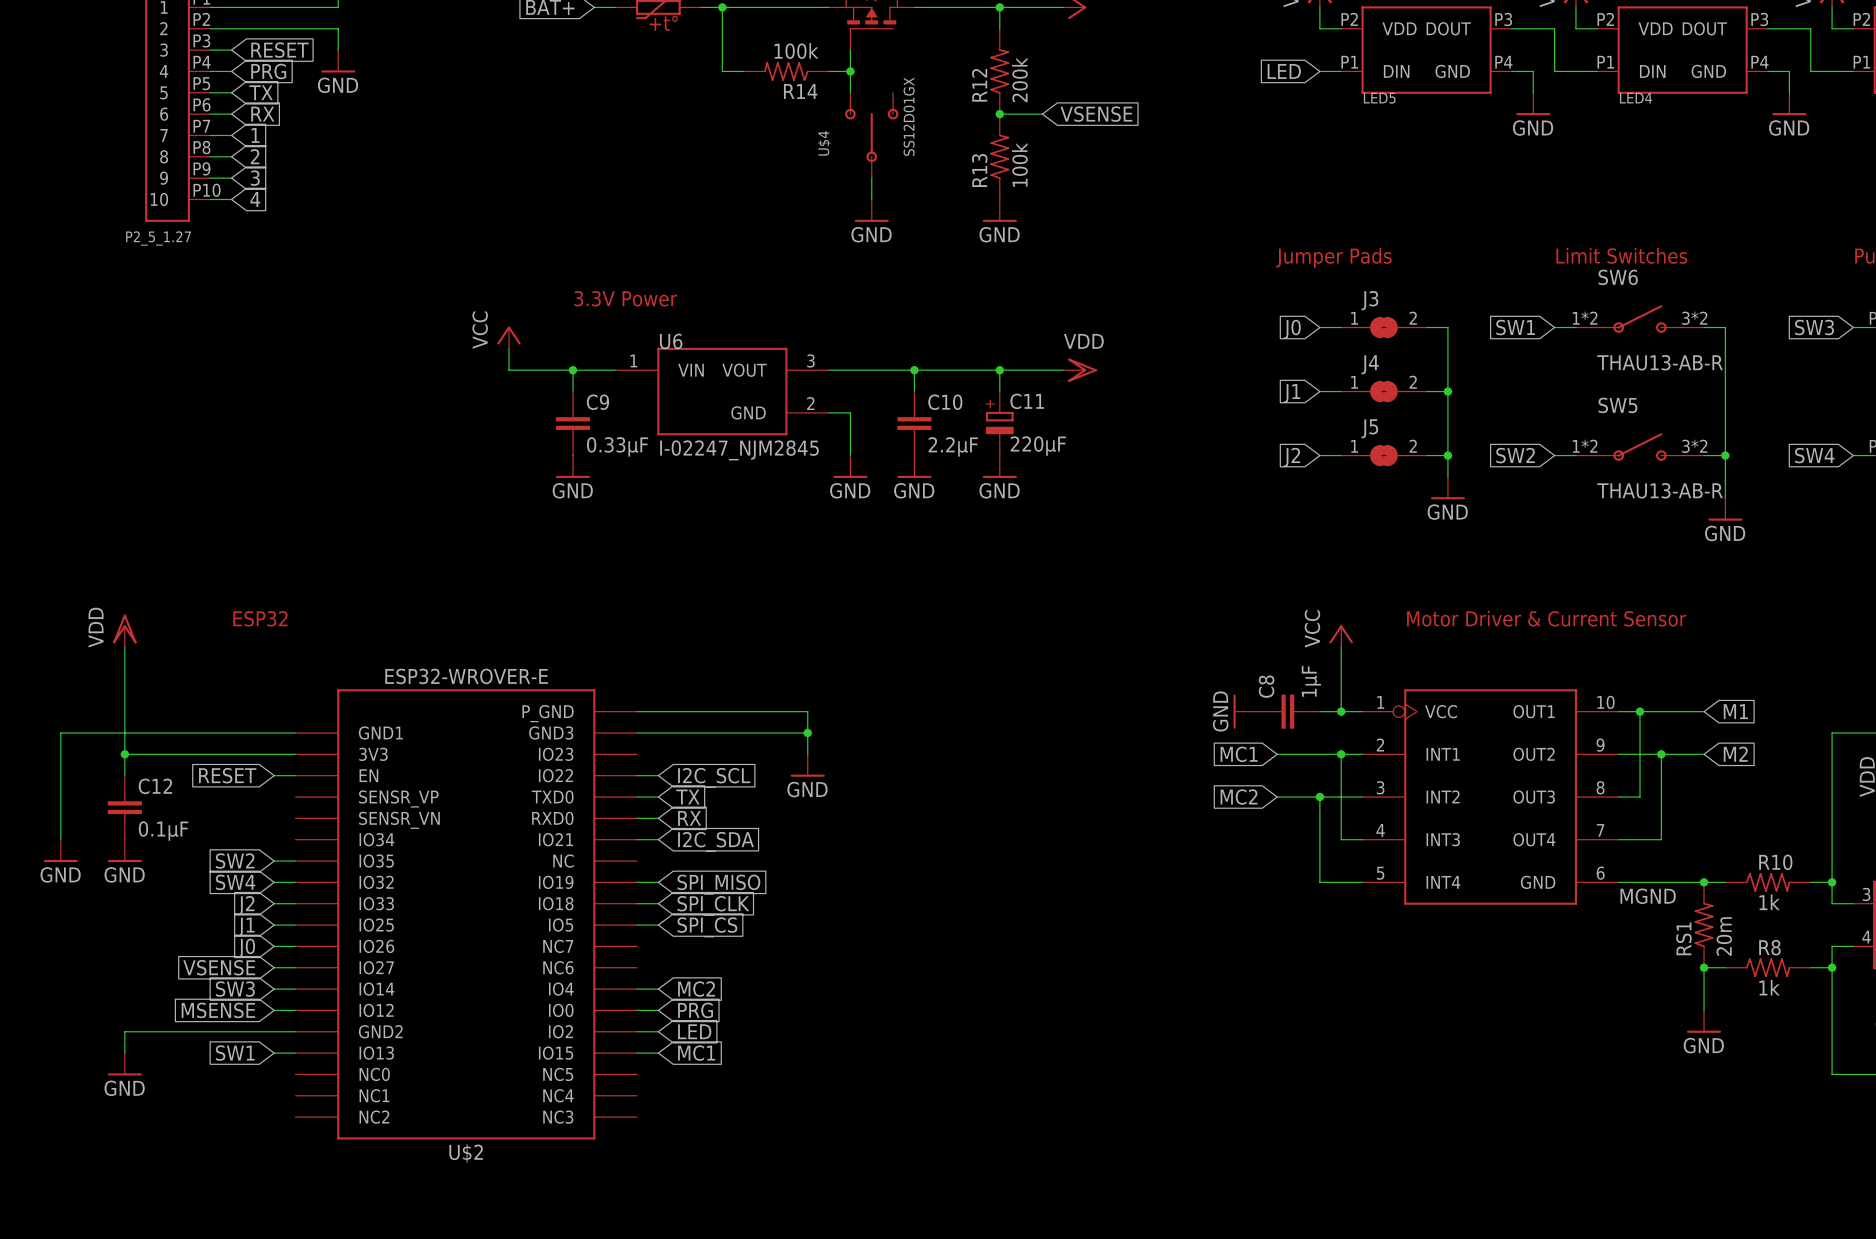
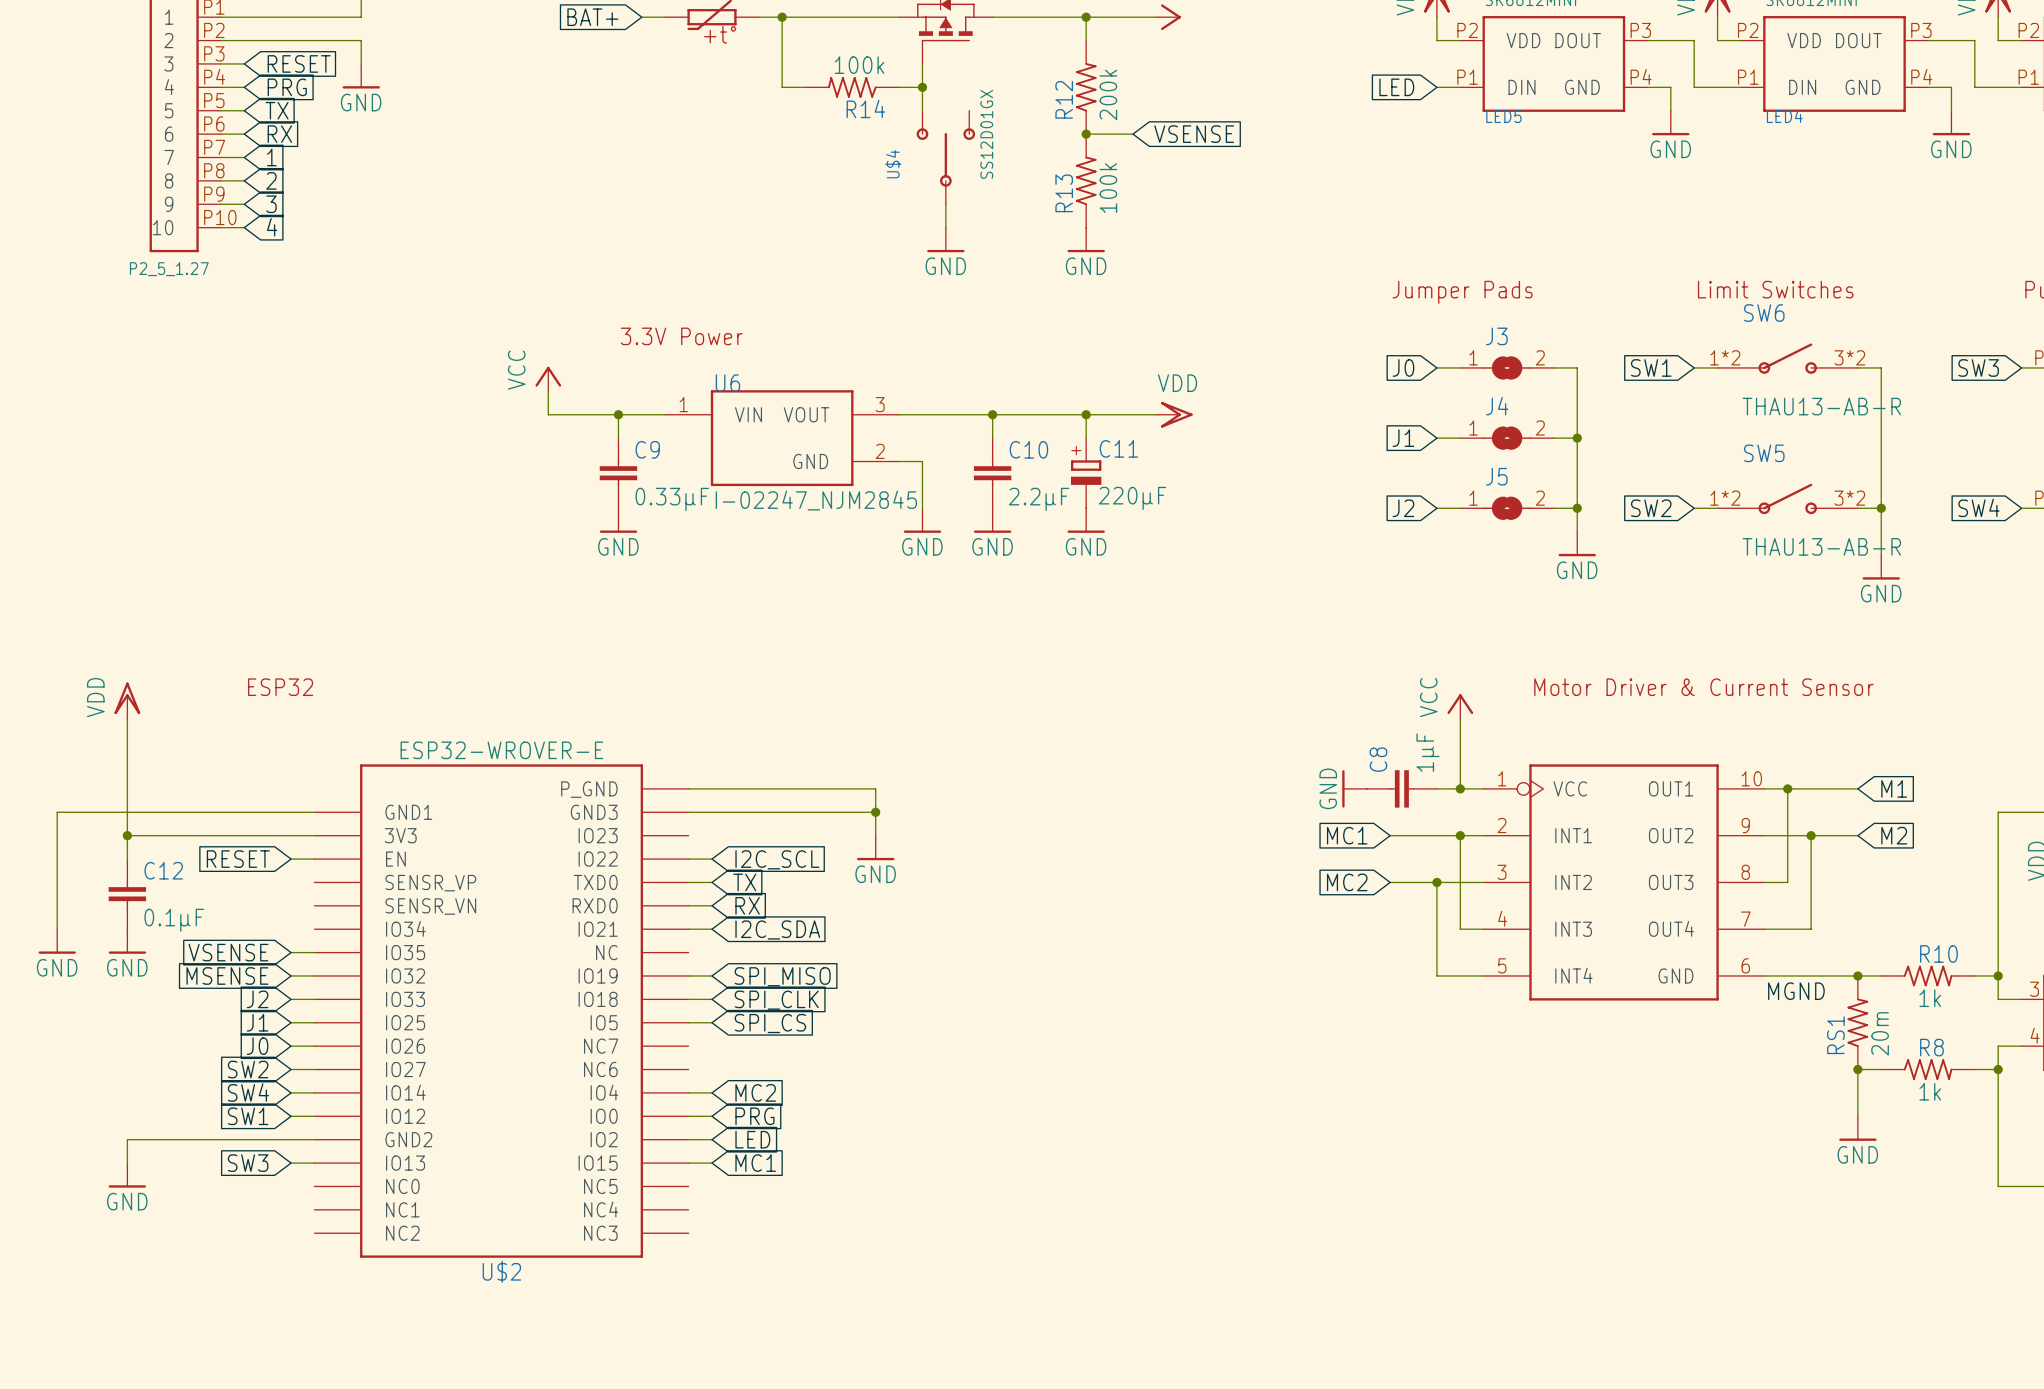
global label: SW2 (235, 861) -> VSENSE (228, 952)
global label: SW4 (235, 882) -> MSENSE (227, 975)
global label: VSENSE (219, 967) -> SW2 (248, 1069)
global label: SW3 (235, 989) -> SW4 (248, 1092)
global label: MSENSE (218, 1010) -> SW1 (248, 1116)
global label: SW1 (235, 1053) -> SW3 (248, 1163)

